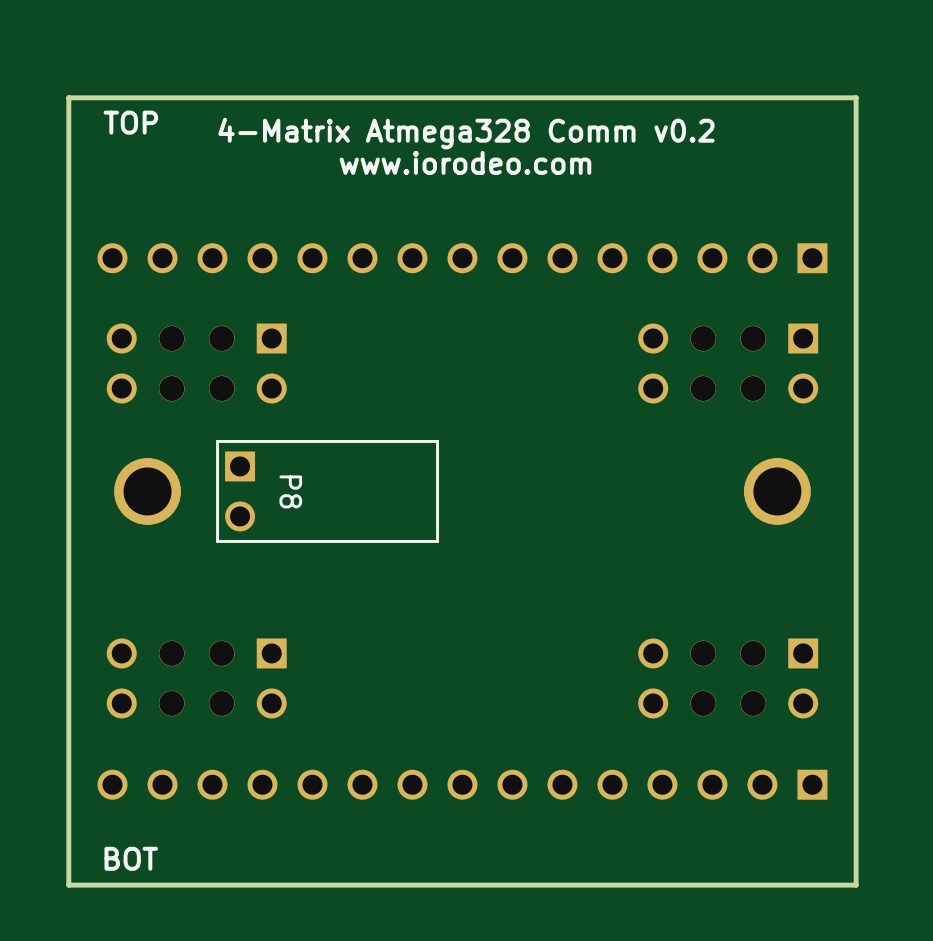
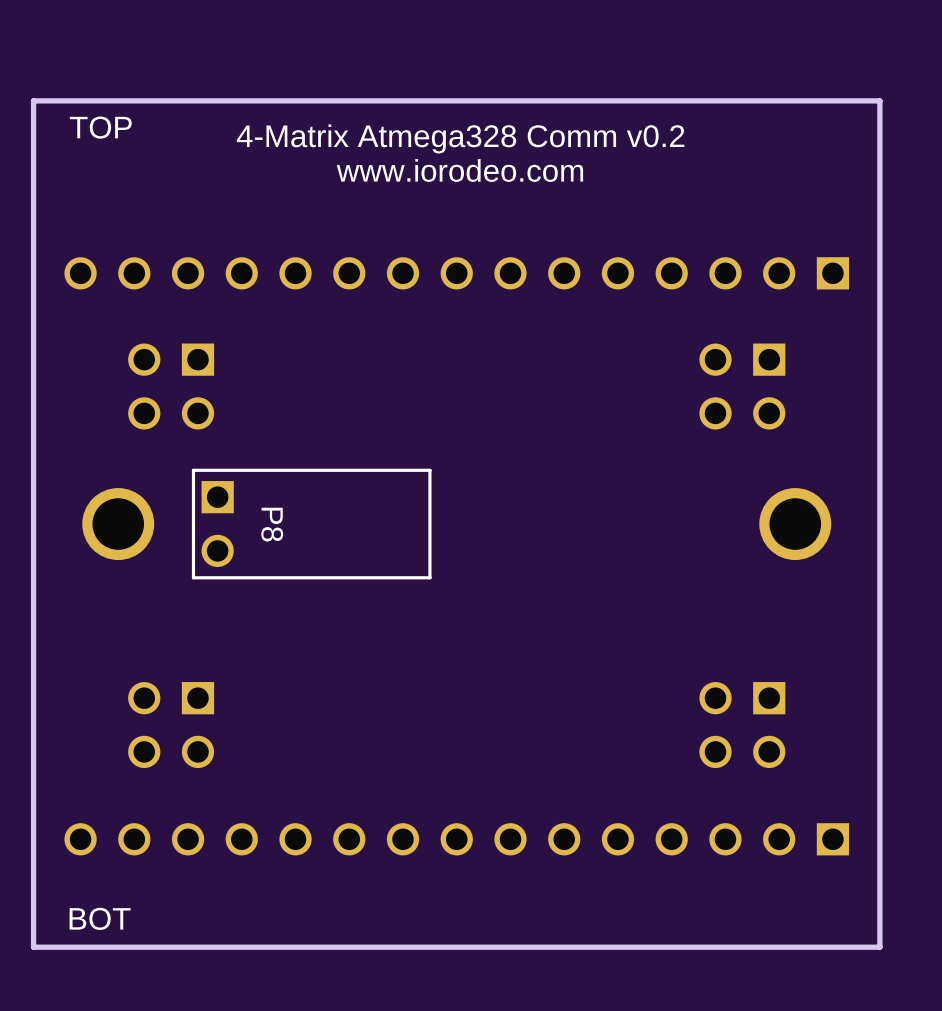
part footprint: [106, 323, 287, 404] -> [128, 343, 215, 430]
part footprint: [638, 323, 819, 404] -> [699, 343, 786, 430]
part footprint: [106, 638, 287, 719] -> [128, 682, 215, 769]
part footprint: [638, 638, 819, 719] -> [699, 682, 786, 769]

